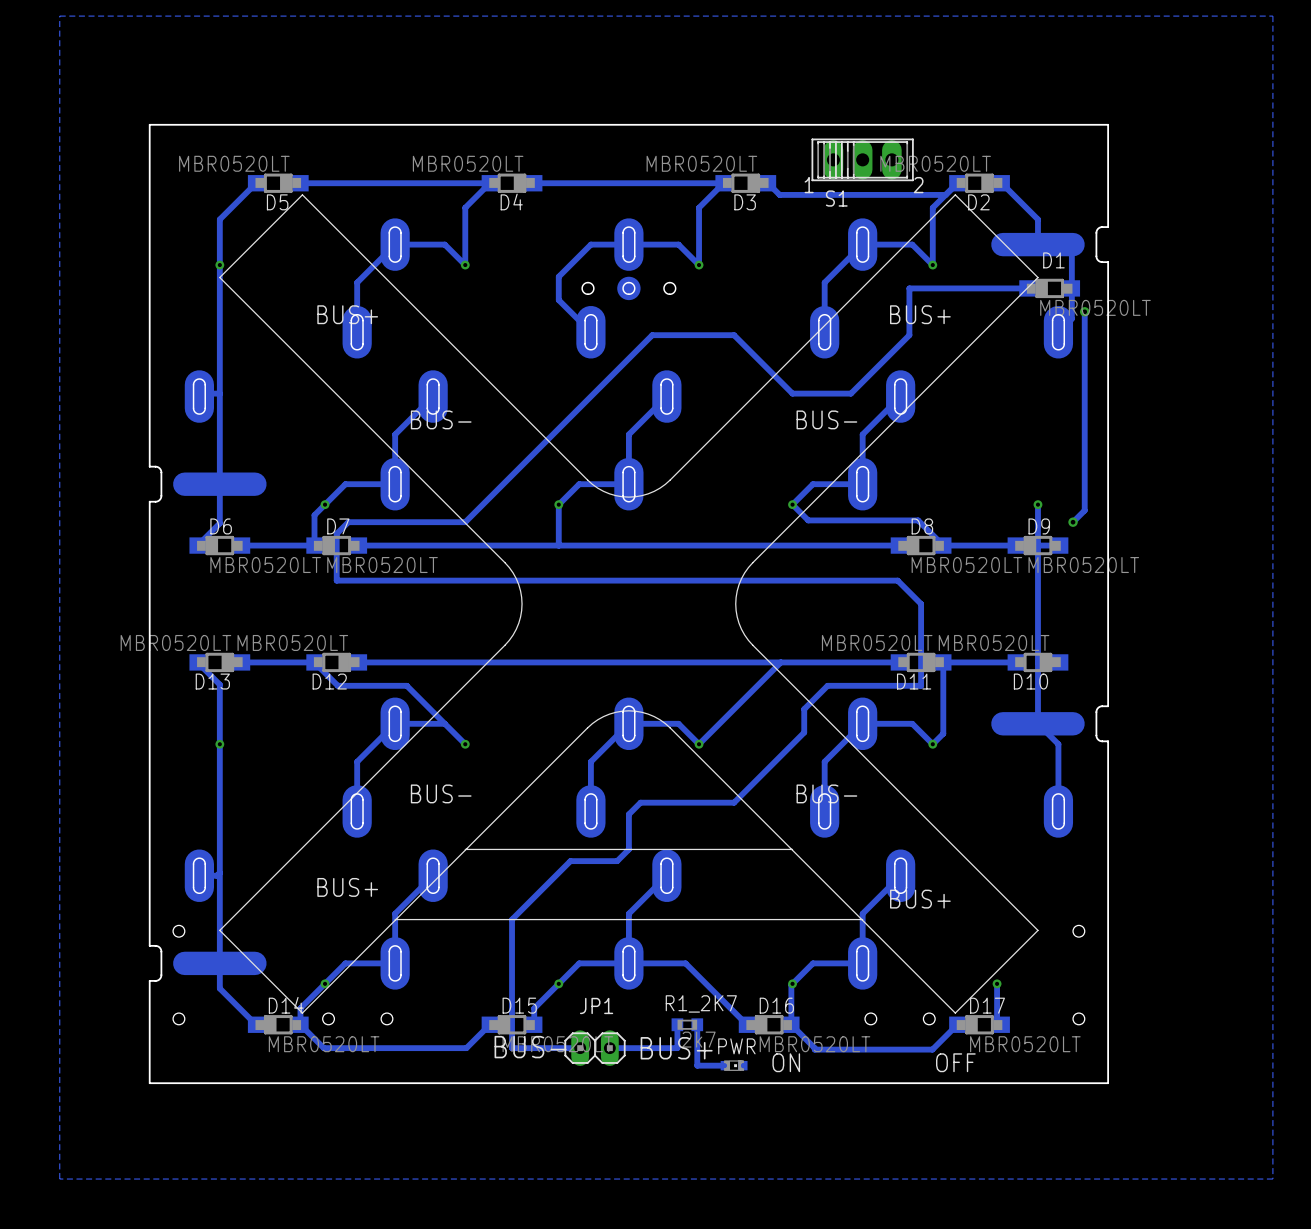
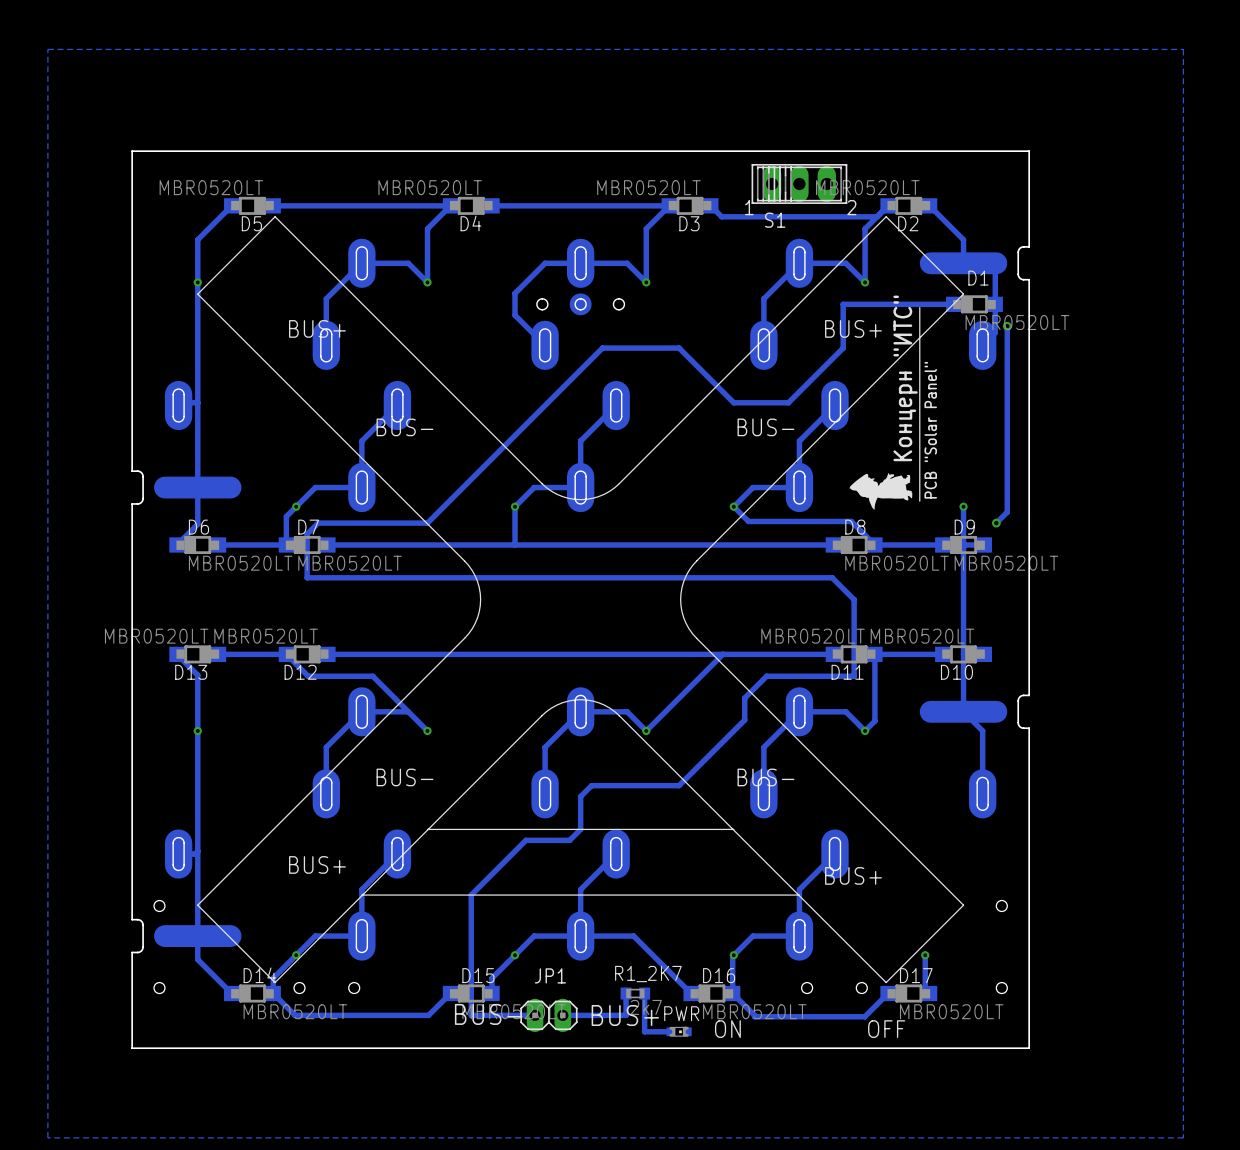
drawing: none -> [849, 307, 921, 510]

